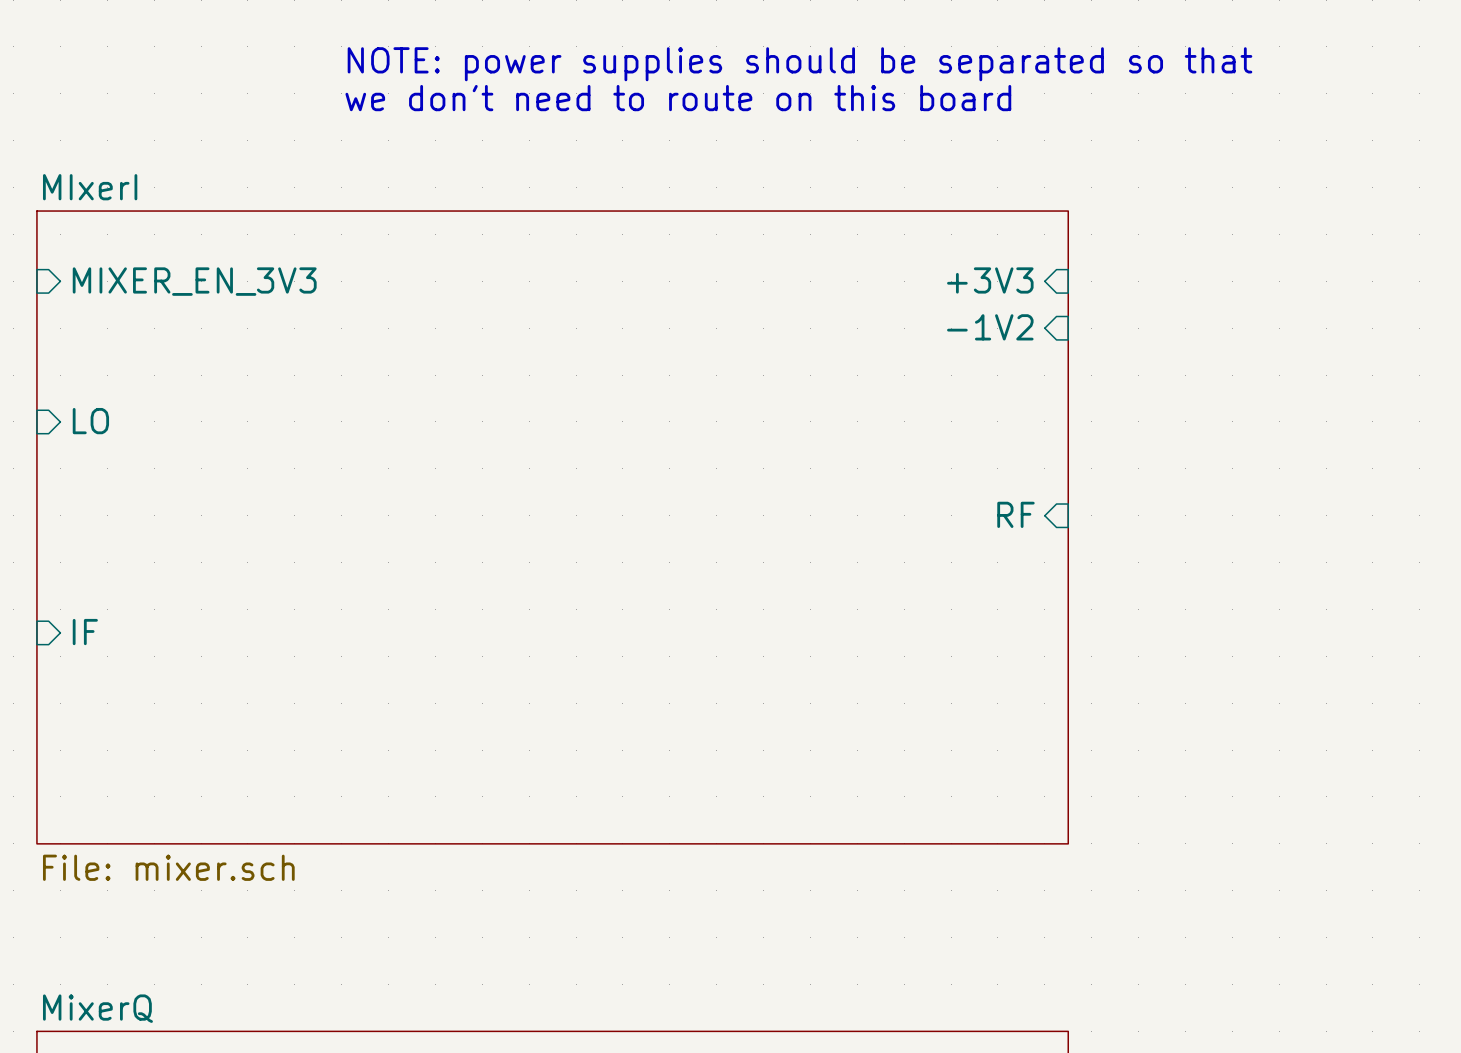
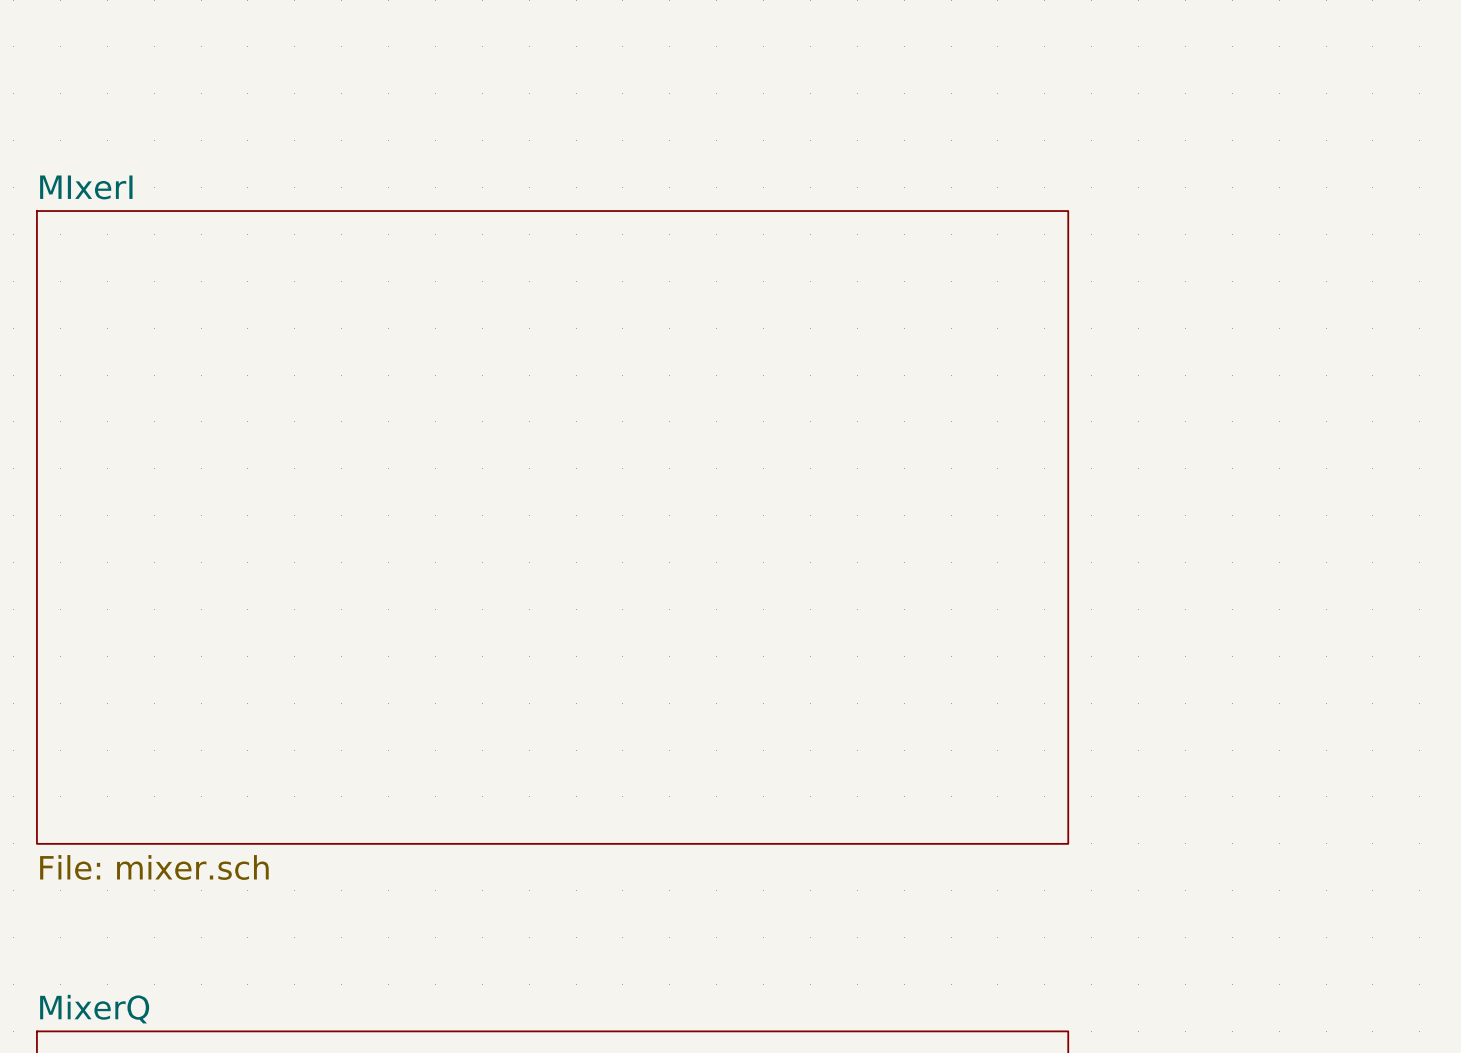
text: NOTE: power supplies should be separated so that (799, 64) -> none
text: we don't need to route on this board (678, 98) -> none
sheet pin: +3V3 (990, 280) -> none
sheet pin: MIXER_EN_3V3 (194, 281) -> none
sheet pin: -1V2 (990, 327) -> none
sheet pin: LO (90, 421) -> none
sheet pin: RF (1015, 514) -> none
sheet pin: IF (85, 632) -> none

